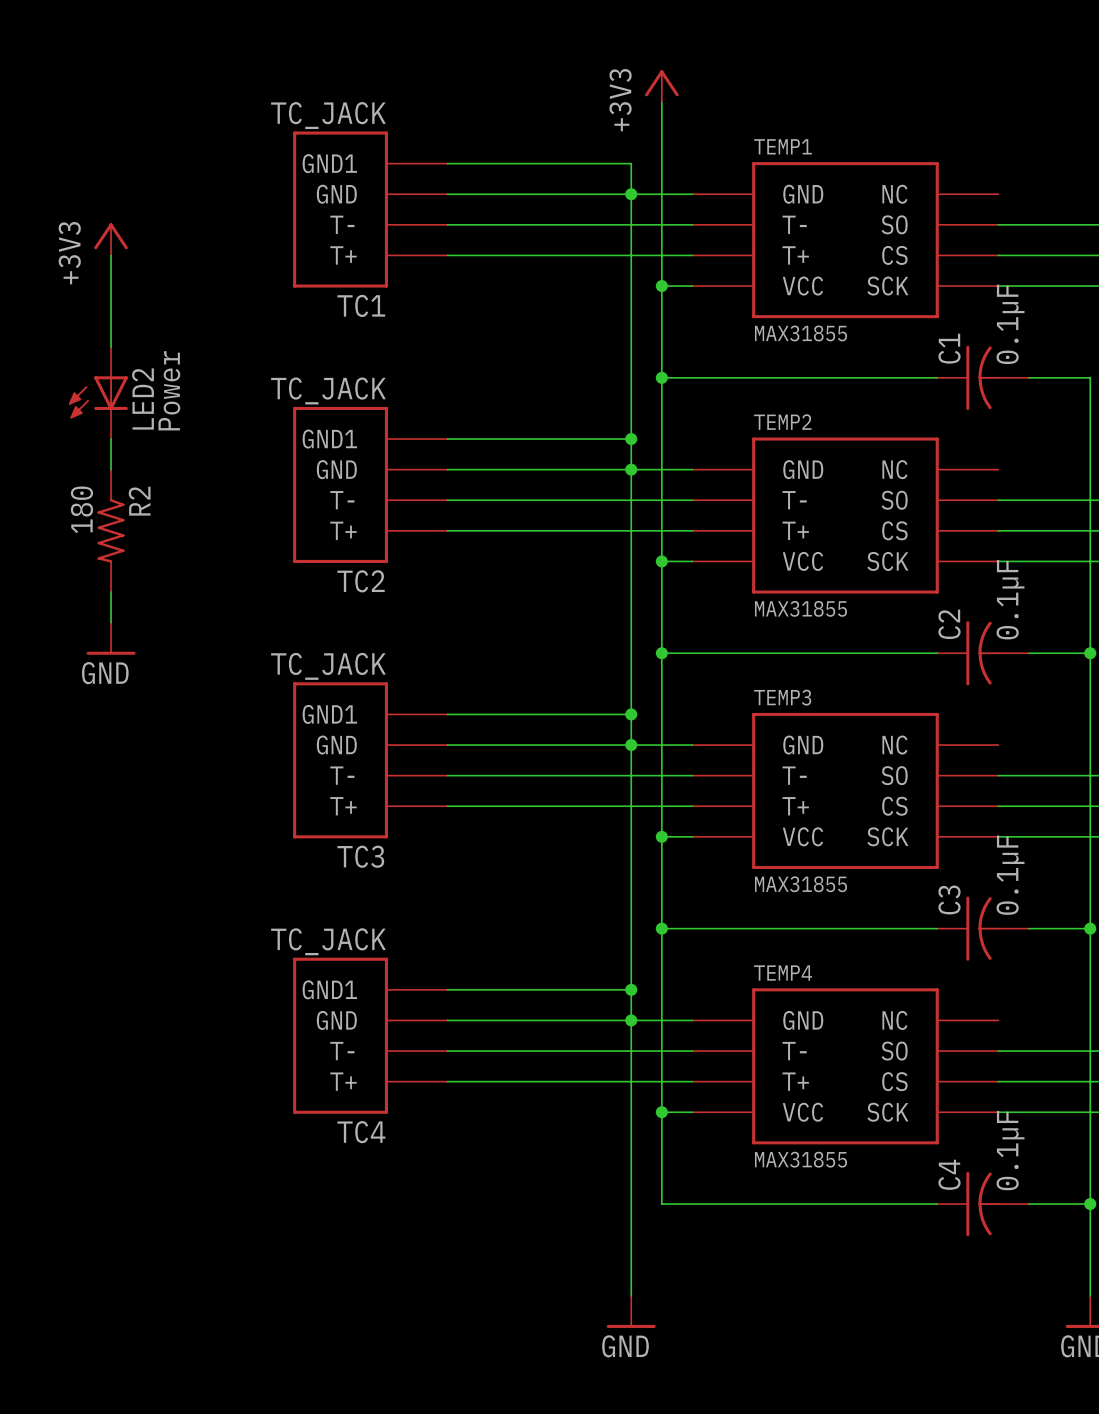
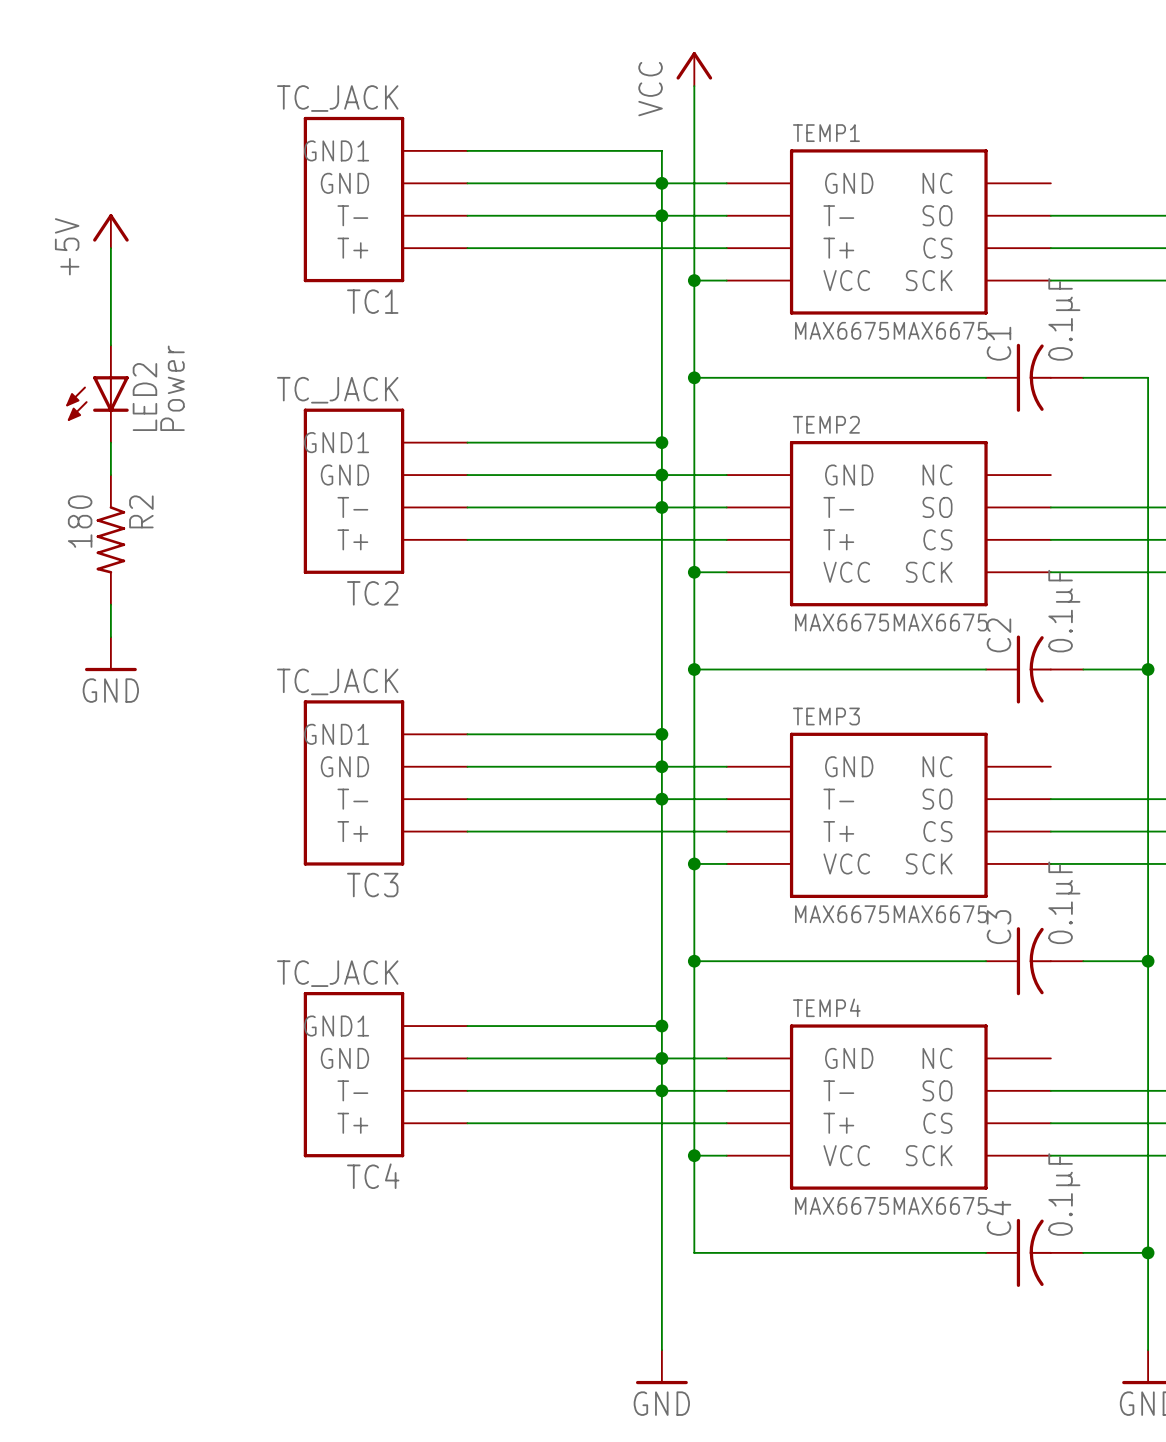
power symbol: +3V3 (661, 86) -> VCC (694, 69)
junction: none -> (661, 215)
power symbol: +3V3 (111, 239) -> +5V (110, 231)
TEMP1 value: MAX31855 (801, 333) -> MAX6675MAX6675 (891, 330)
junction: none -> (661, 507)
TEMP2 value: MAX31855 (801, 608) -> MAX6675MAX6675 (891, 622)
junction: none -> (661, 799)
TEMP3 value: MAX31855 (801, 884) -> MAX6675MAX6675 (891, 914)
junction: none -> (661, 1090)
TEMP4 value: MAX31855 (801, 1159) -> MAX6675MAX6675 (891, 1205)

